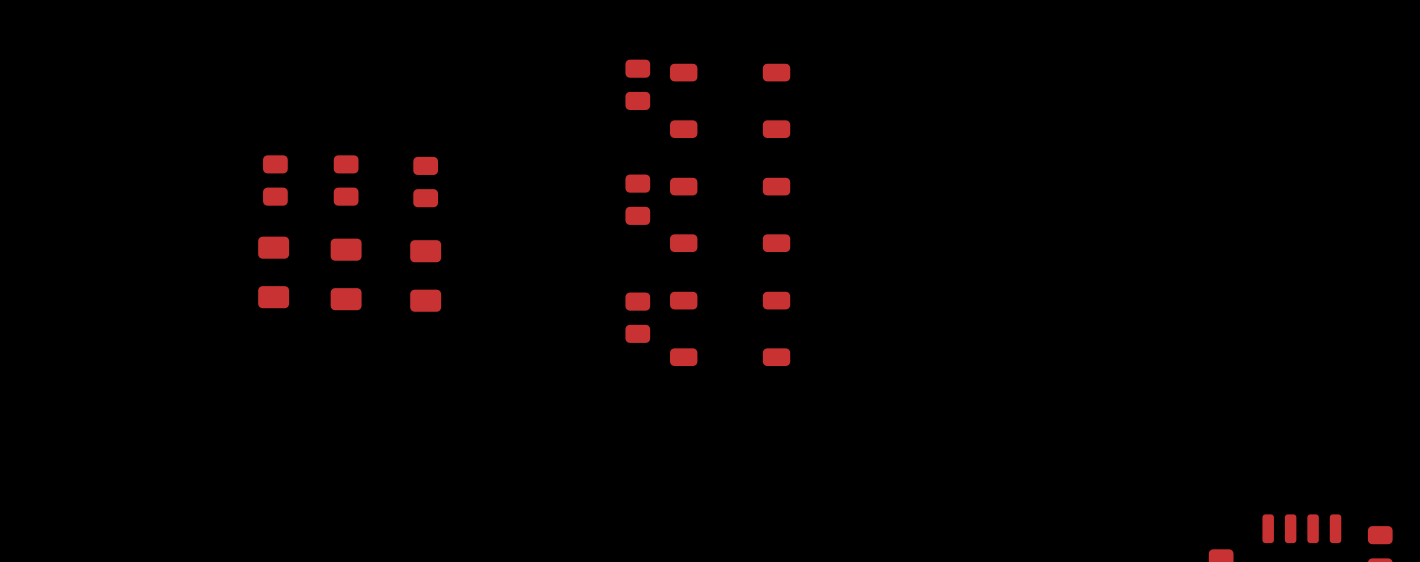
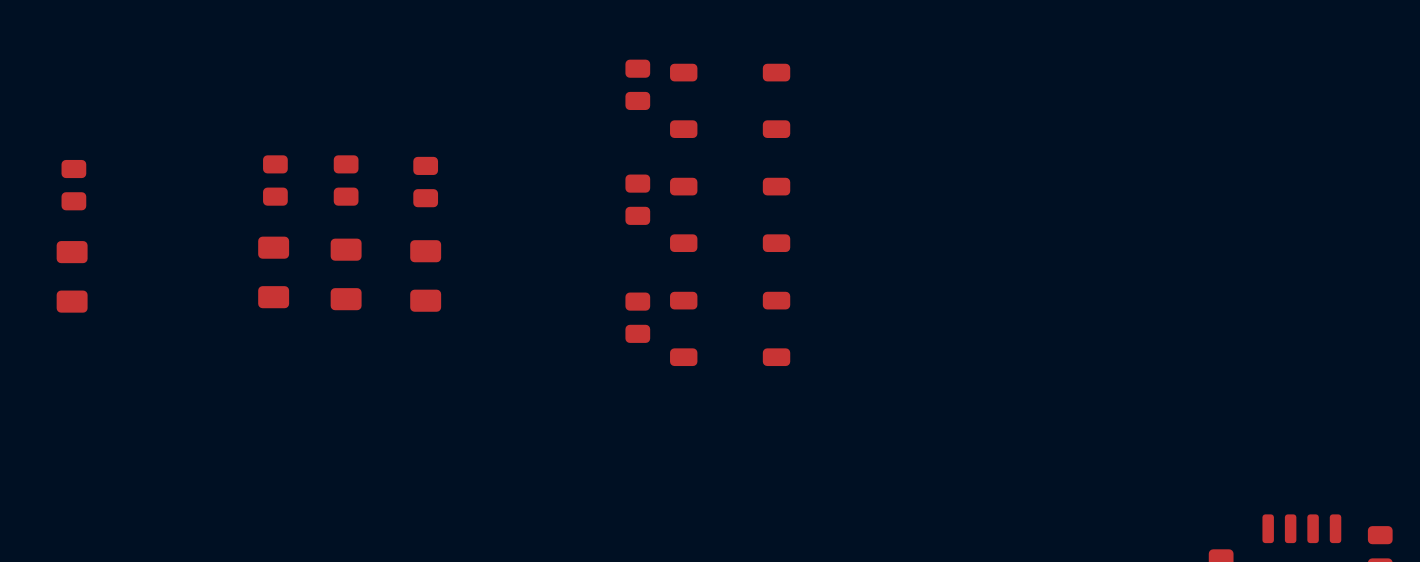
part: none -> (73, 185)
part: none -> (72, 276)

